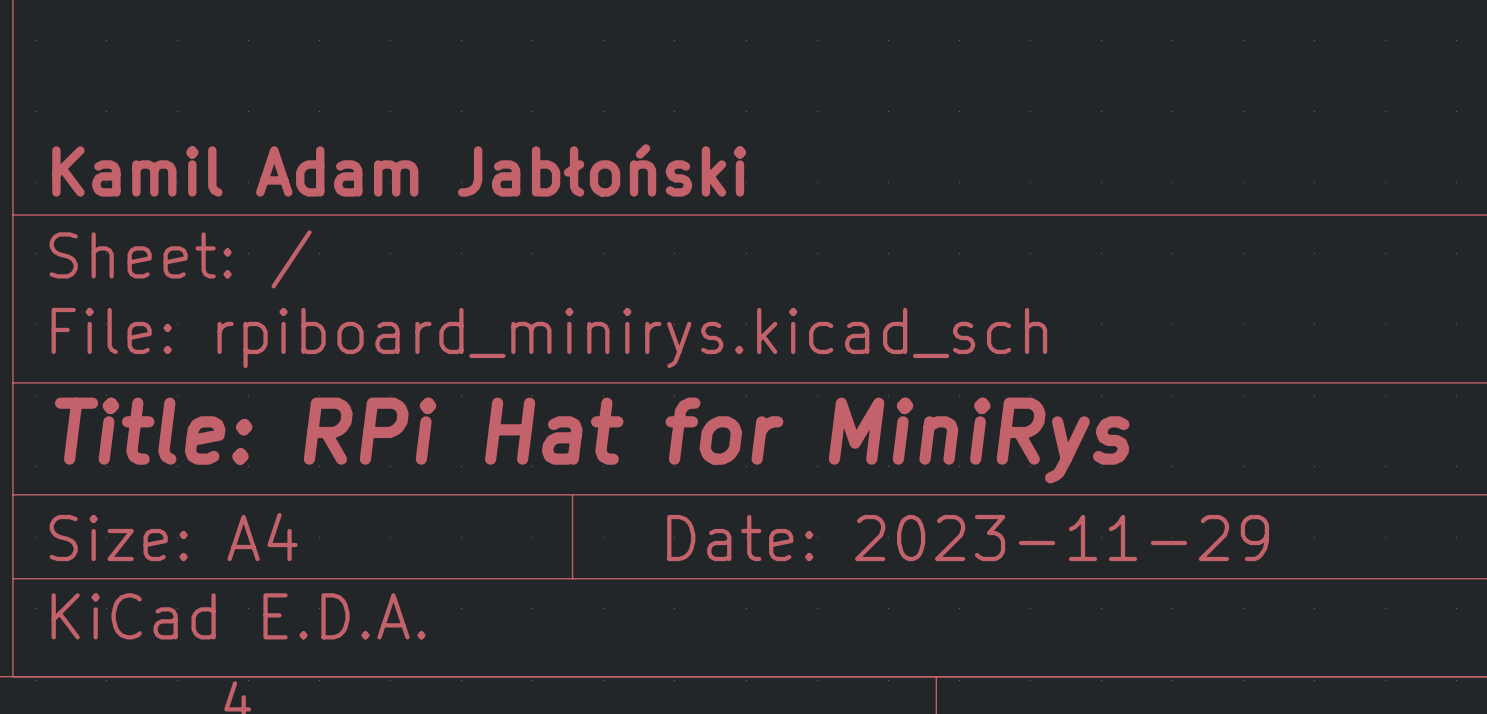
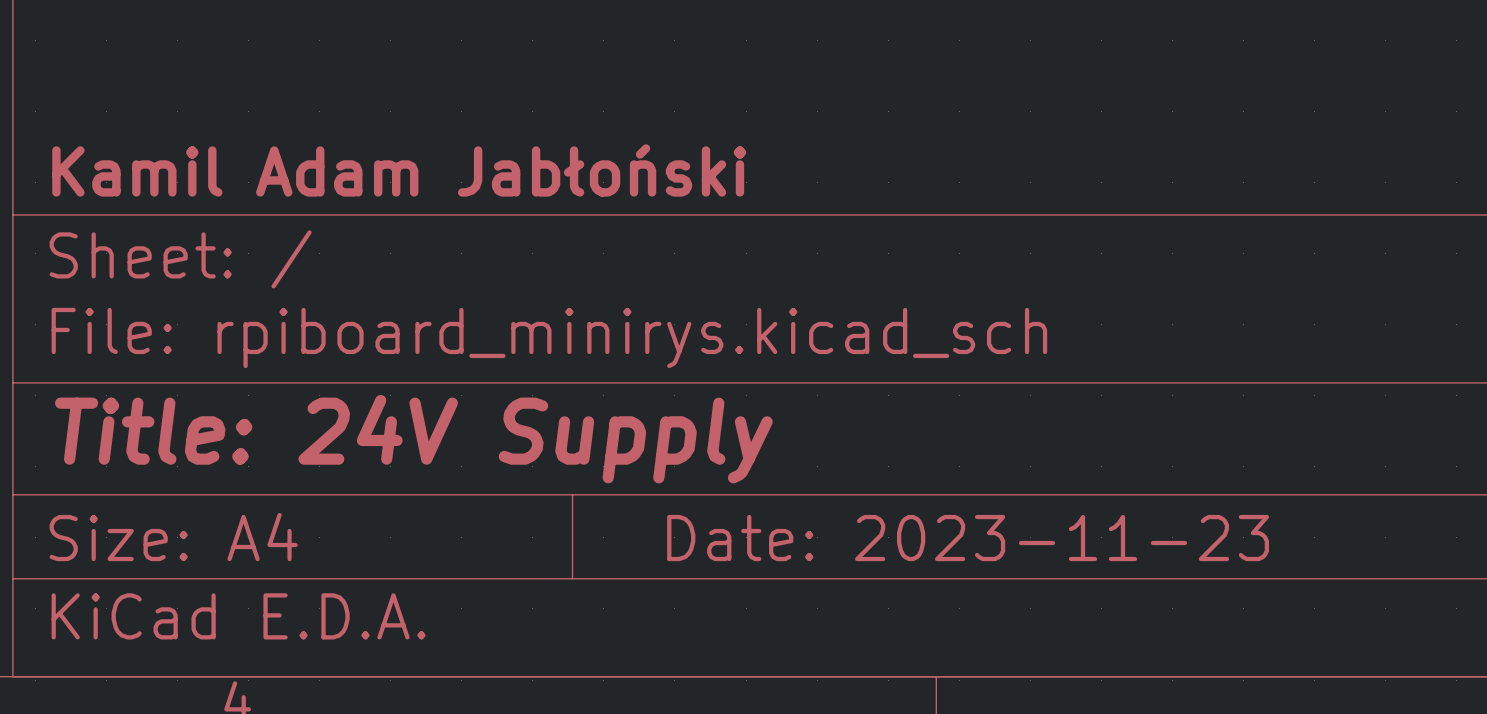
title block: Title: RPi Hat for MiniRys (592, 440) -> Title: 24V Supply (413, 439)
title block: Date: 2023-11-29 (968, 538) -> Date: 2023-11-23 (968, 538)

